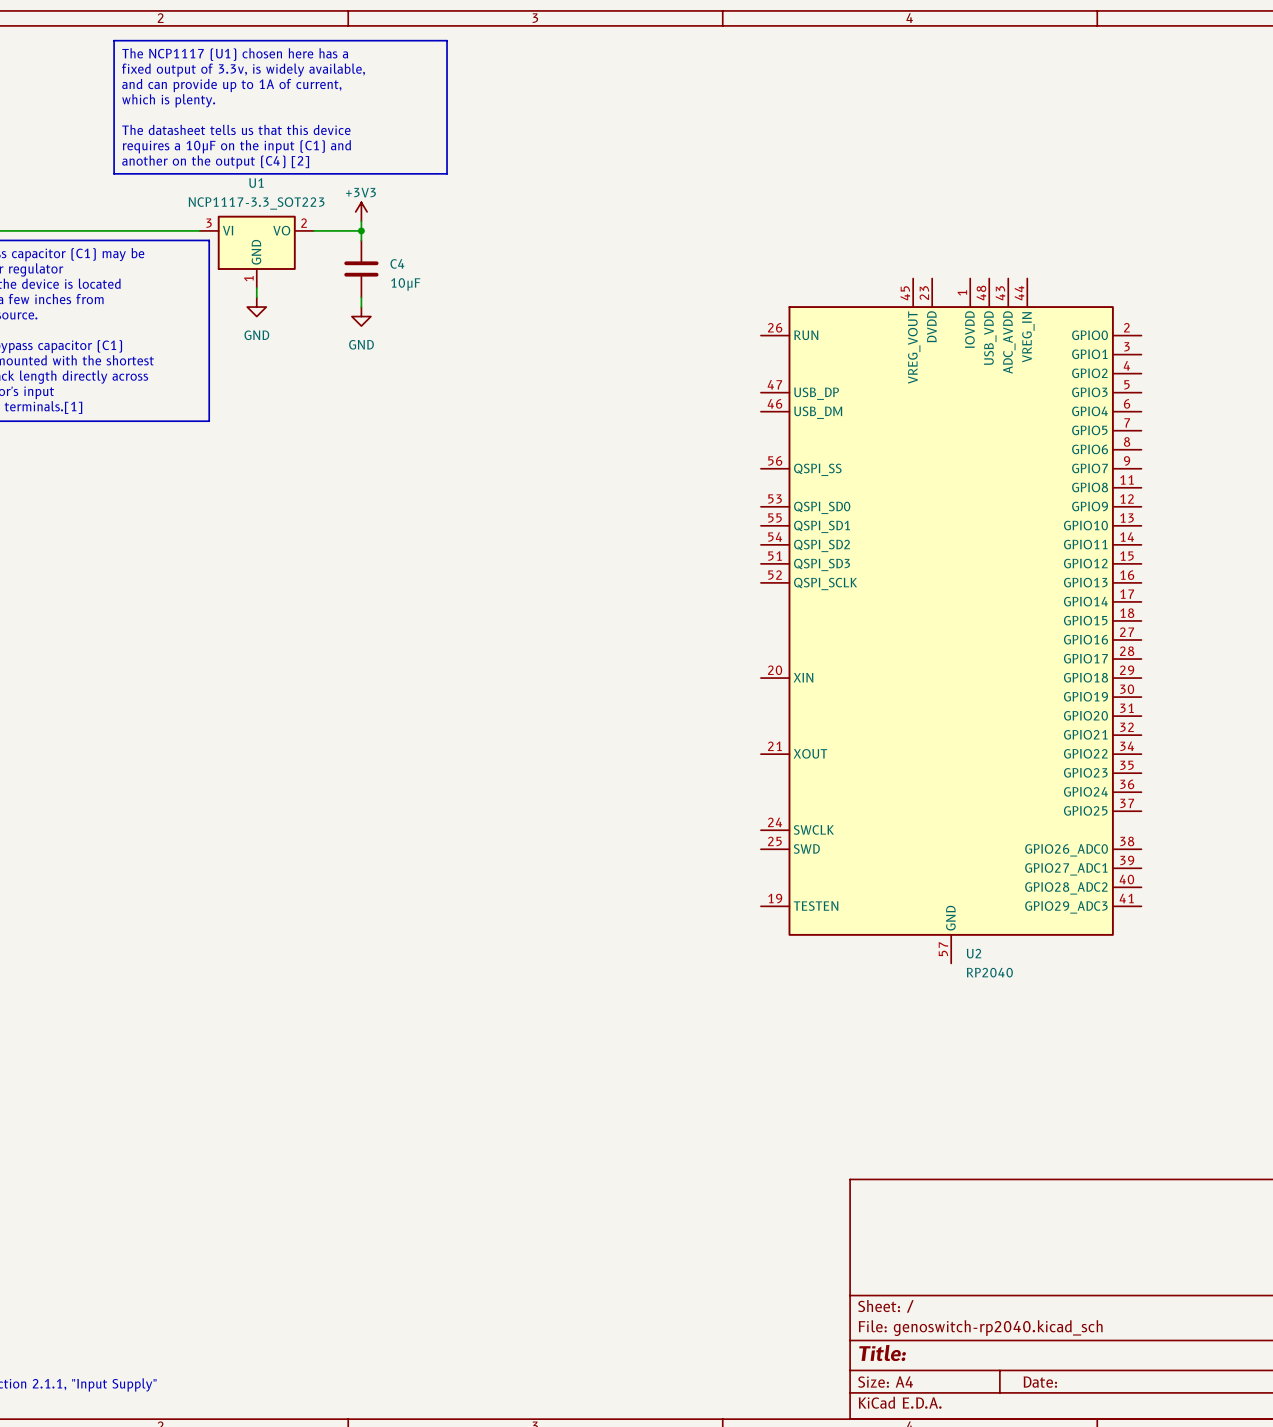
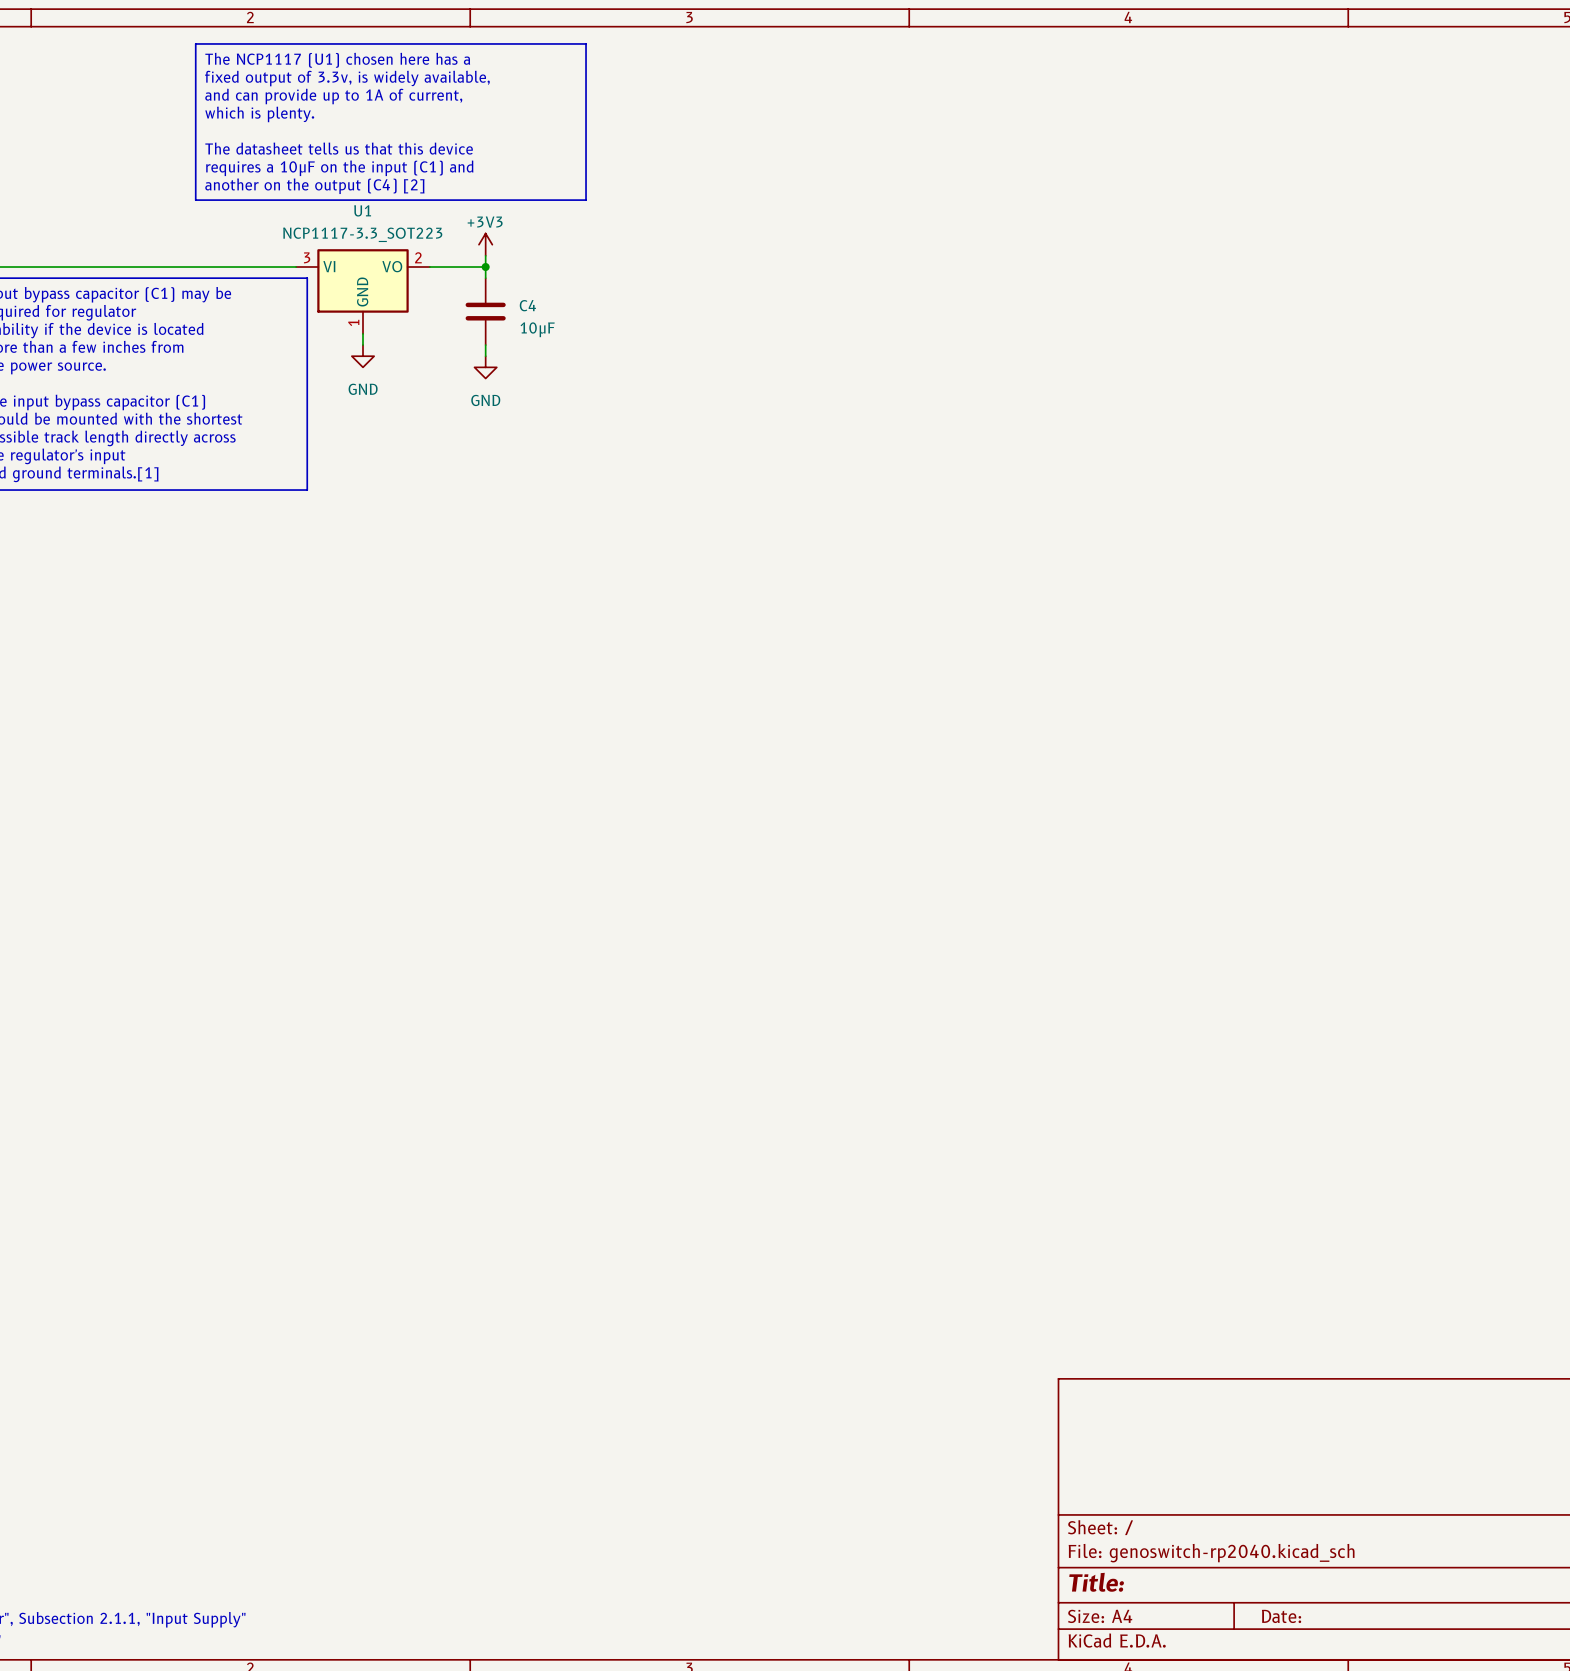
U2: RP2040 (951, 620) -> none

